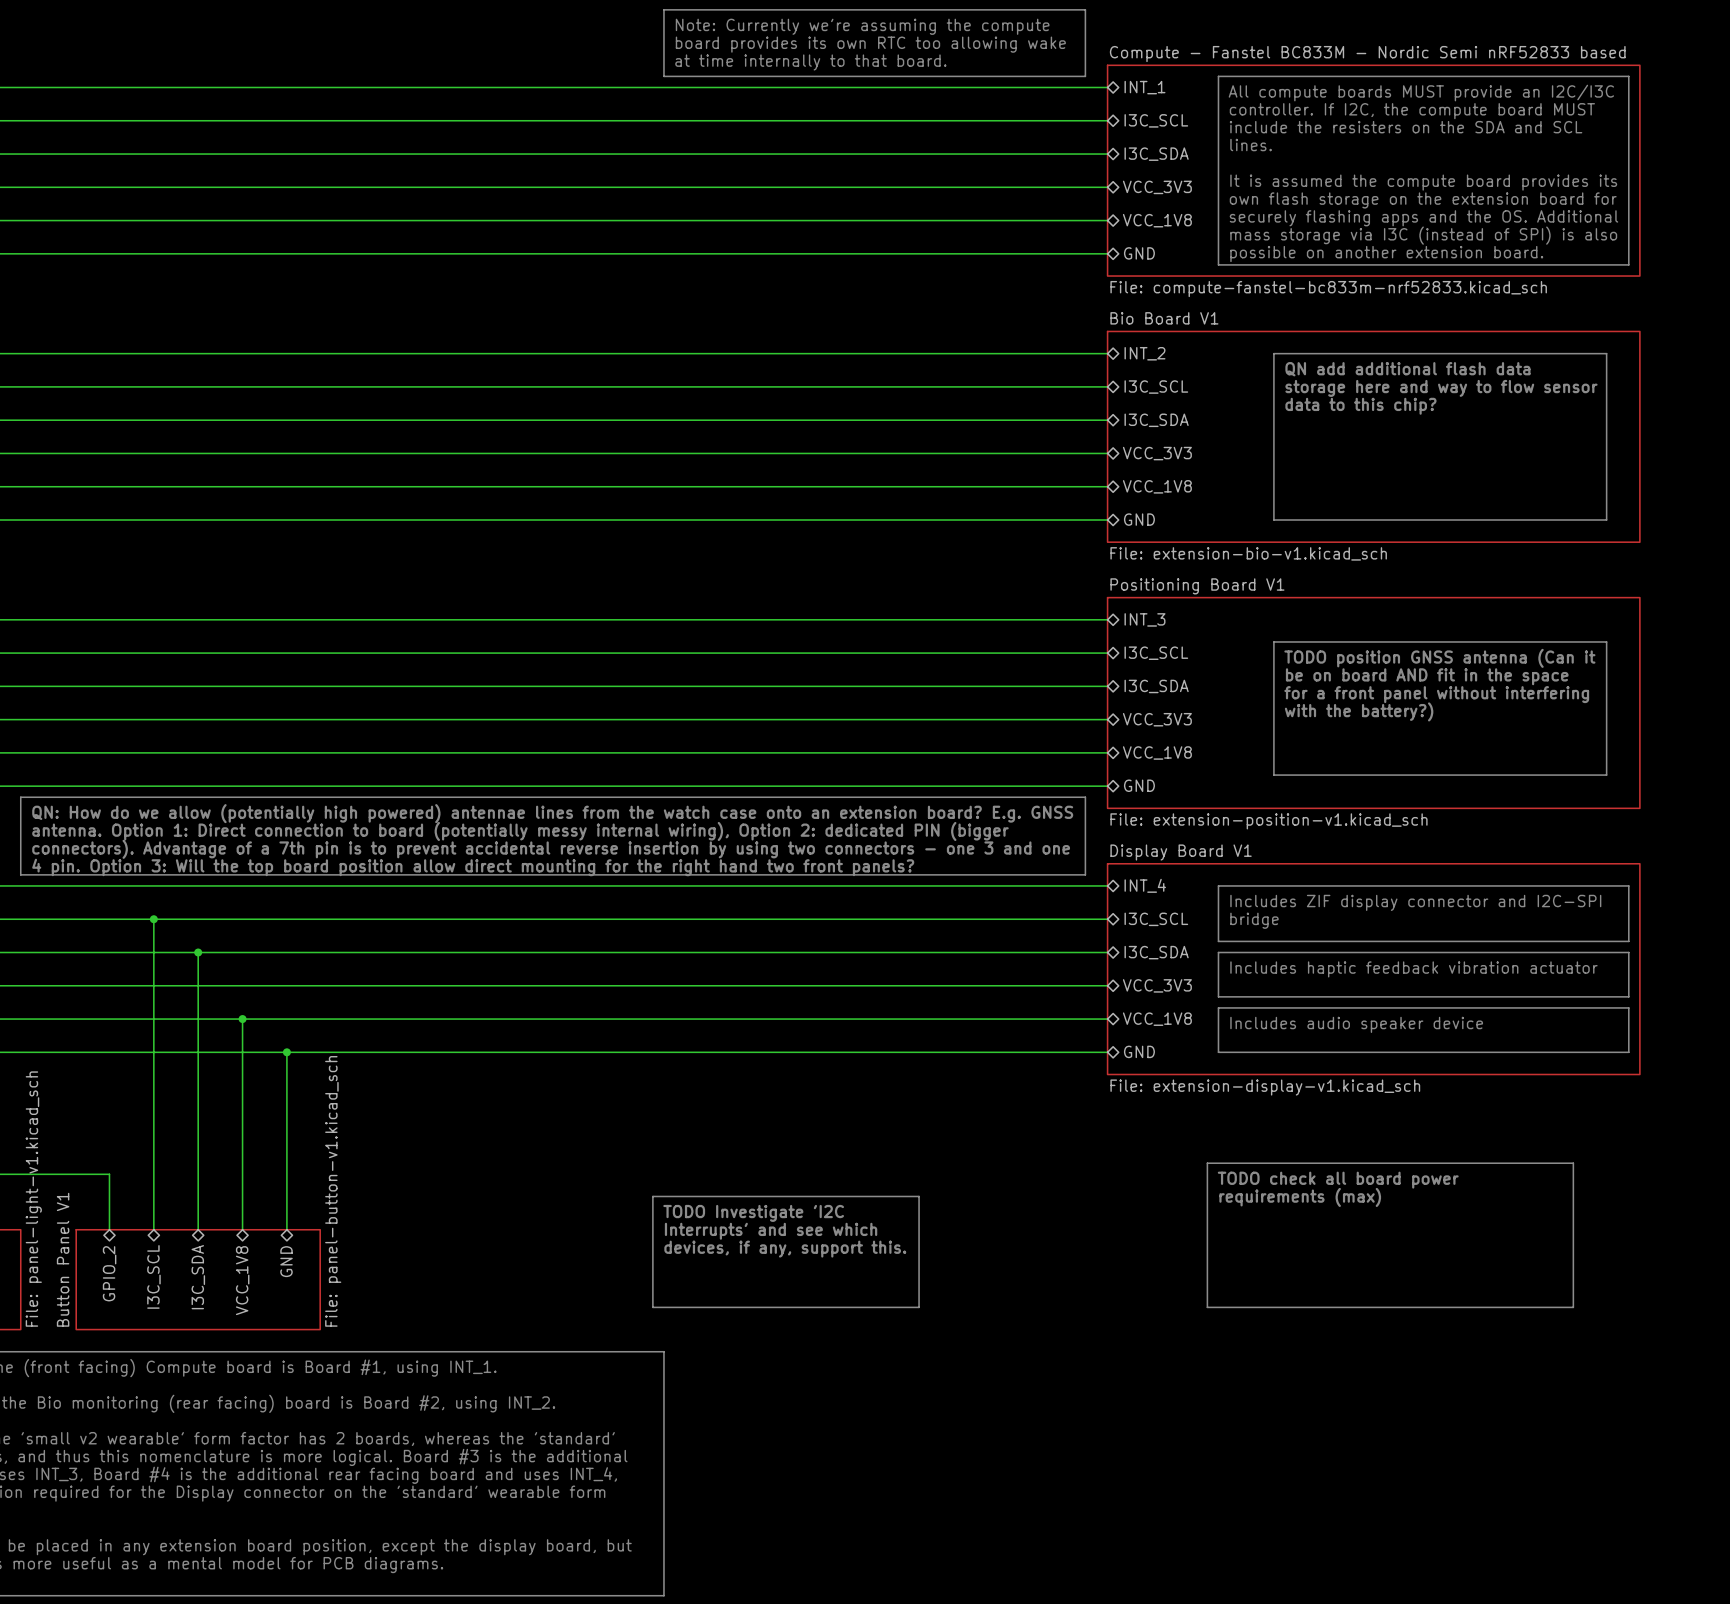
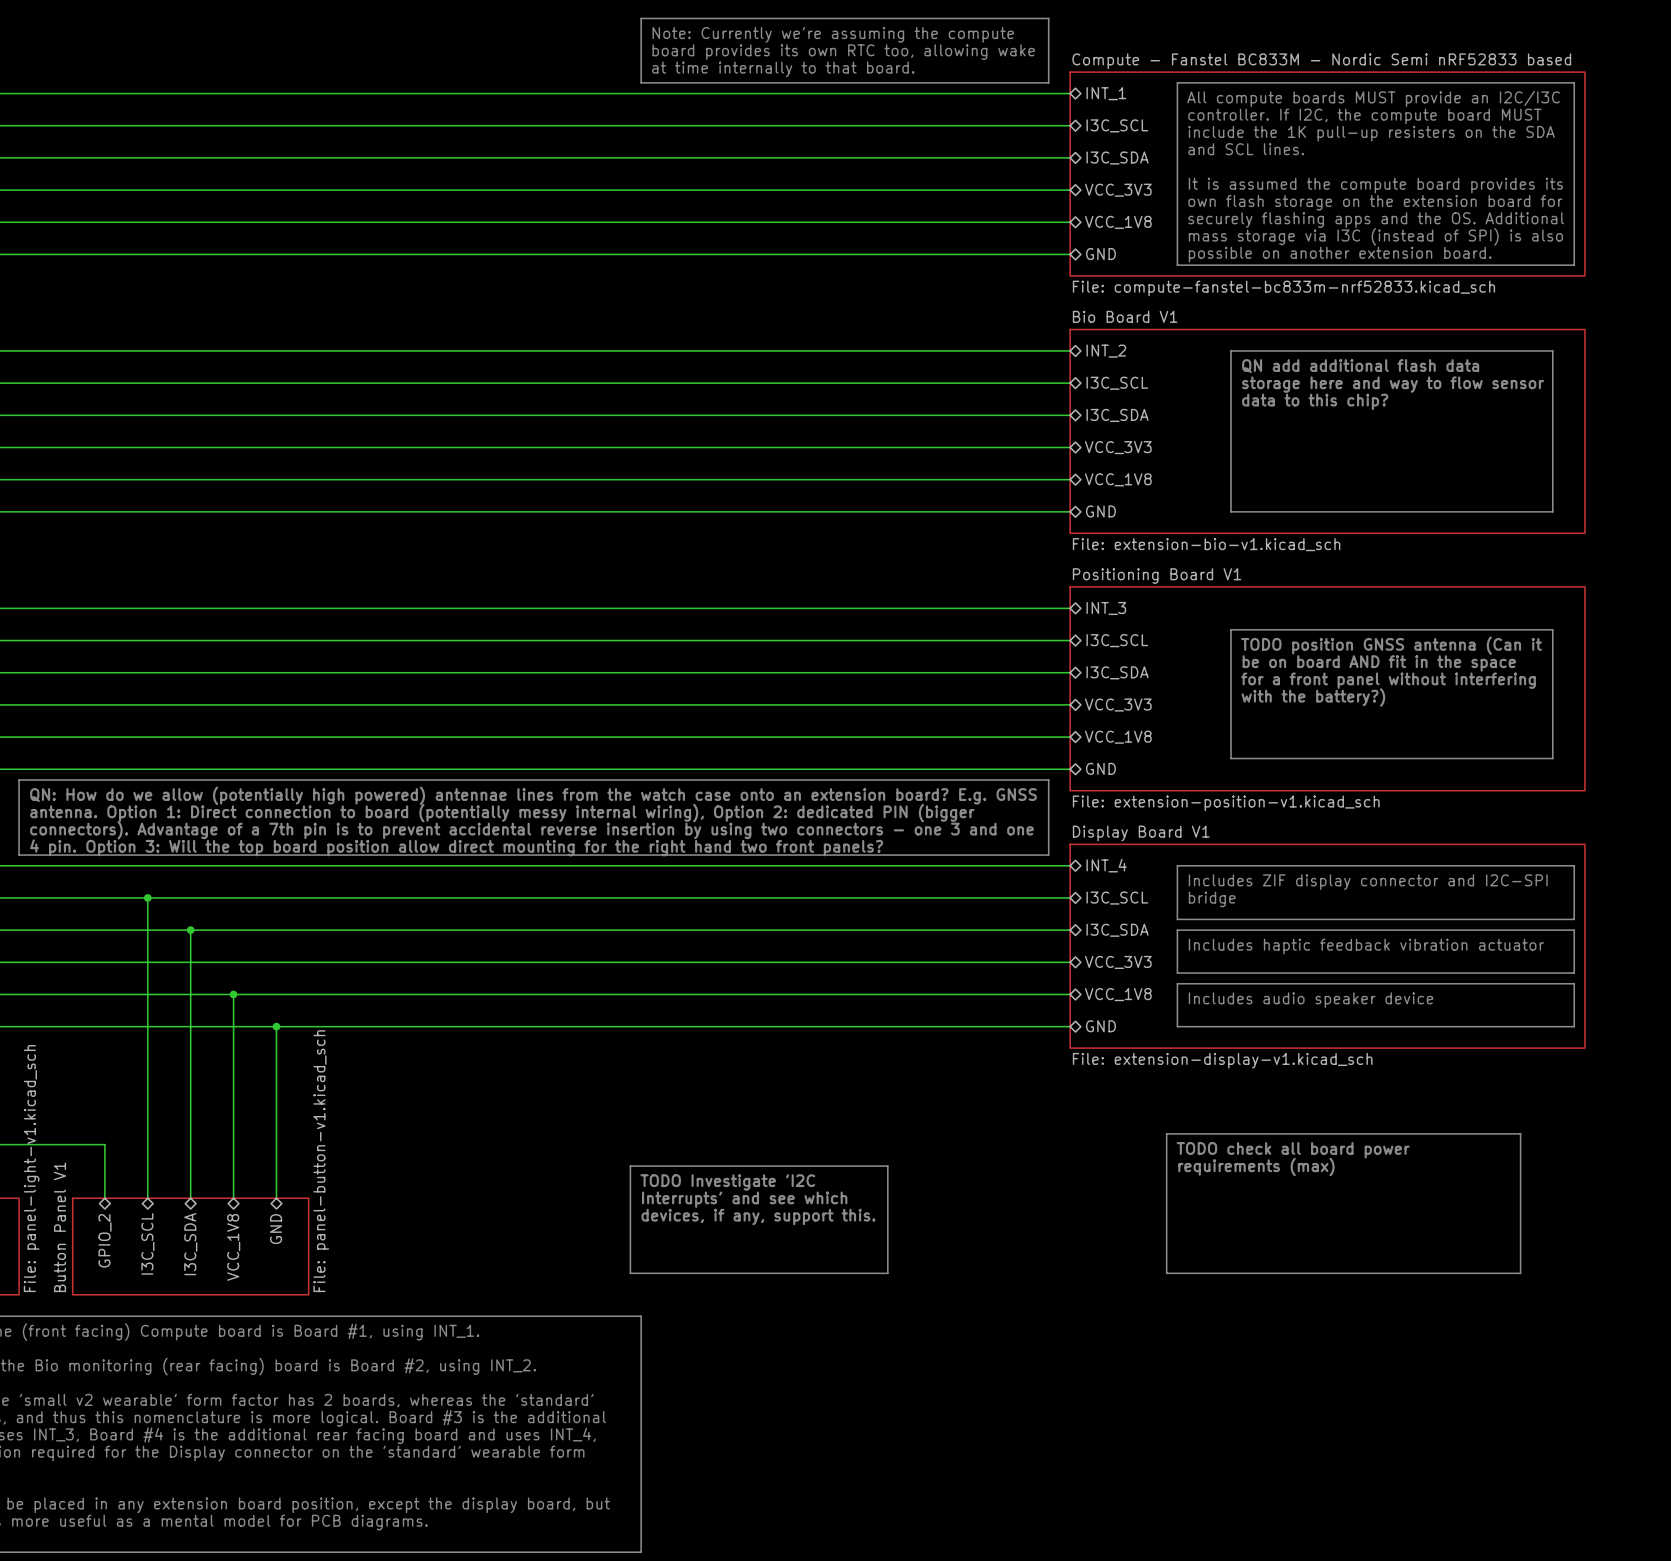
text: board provides its own RTC too allowing wake (870, 44) -> board provides its own RTC too, allowing wake (843, 52)
text: include the resisters on the SDA and SCL (1406, 127) -> include the 1K pull-up resisters on the SDA (1371, 133)
text: lines. (1251, 145) -> and SCL lines. (1246, 149)

